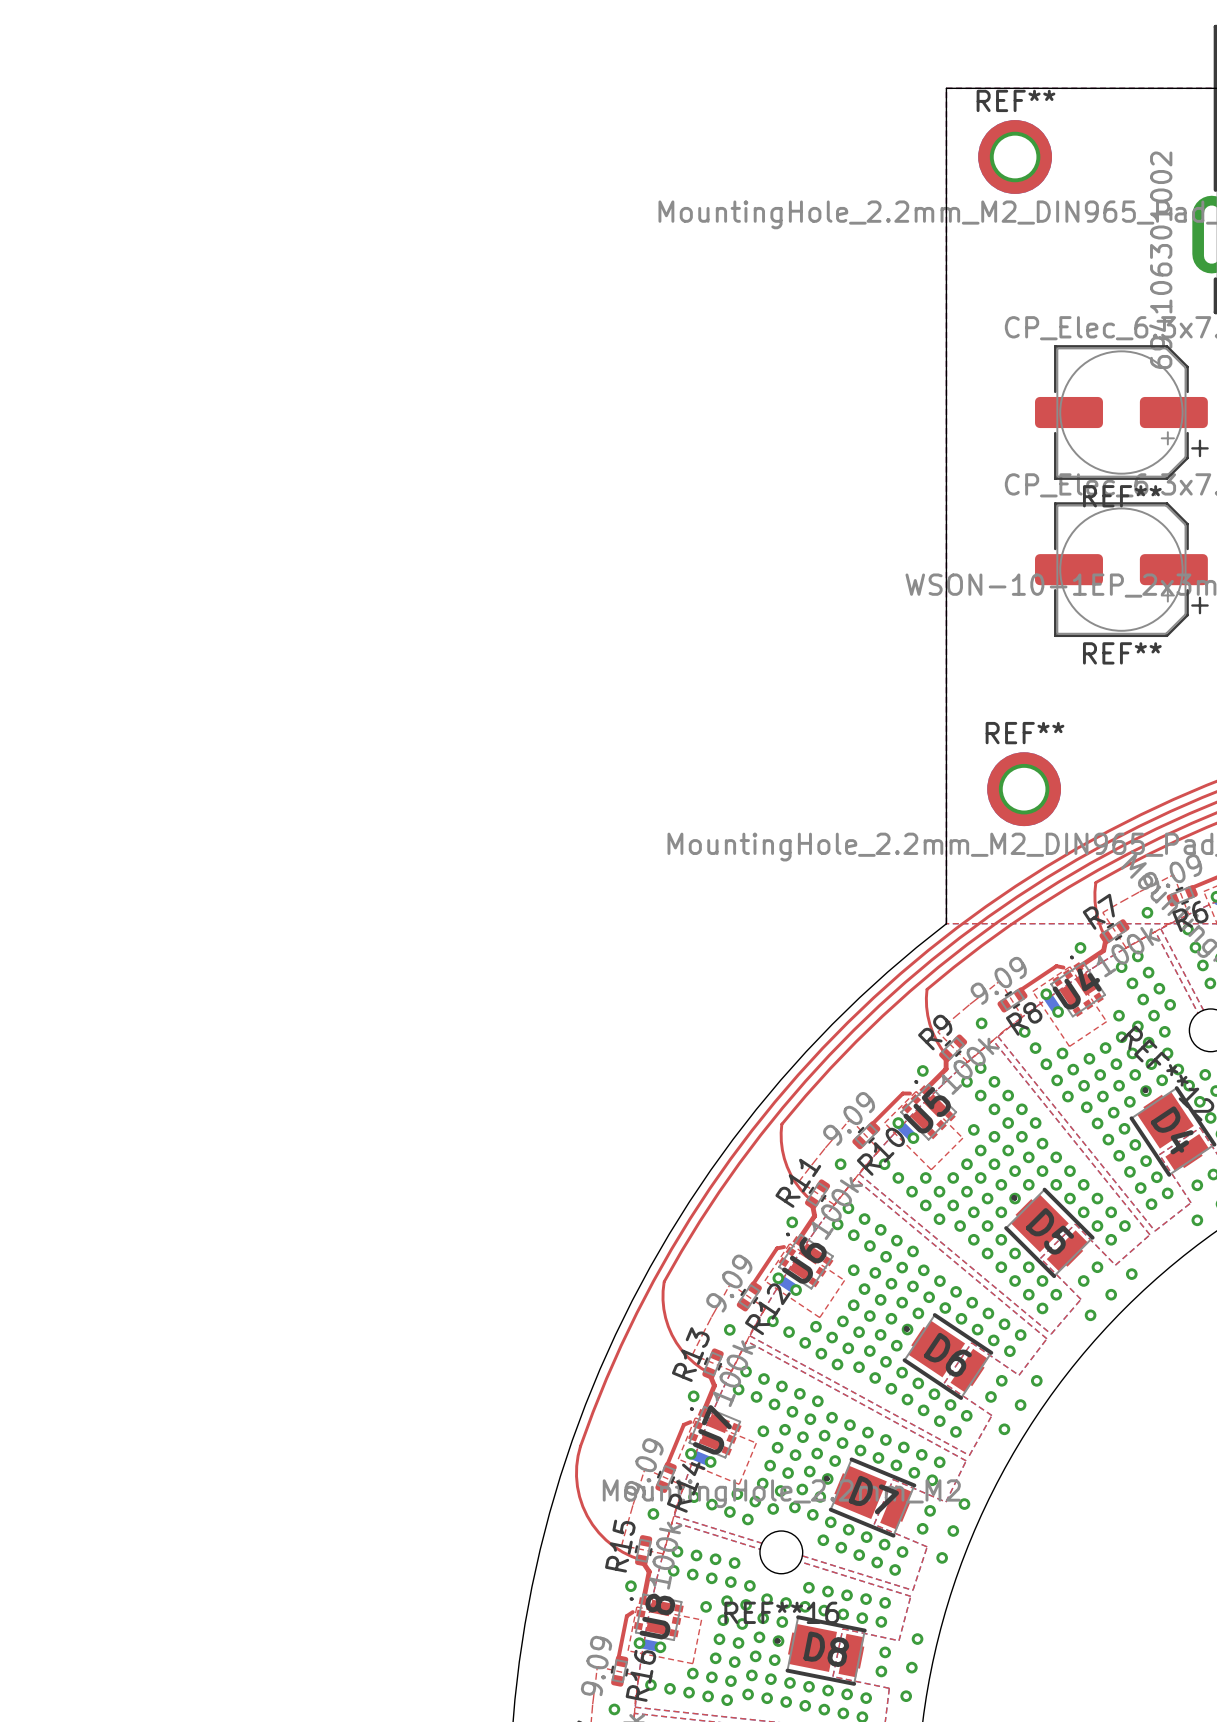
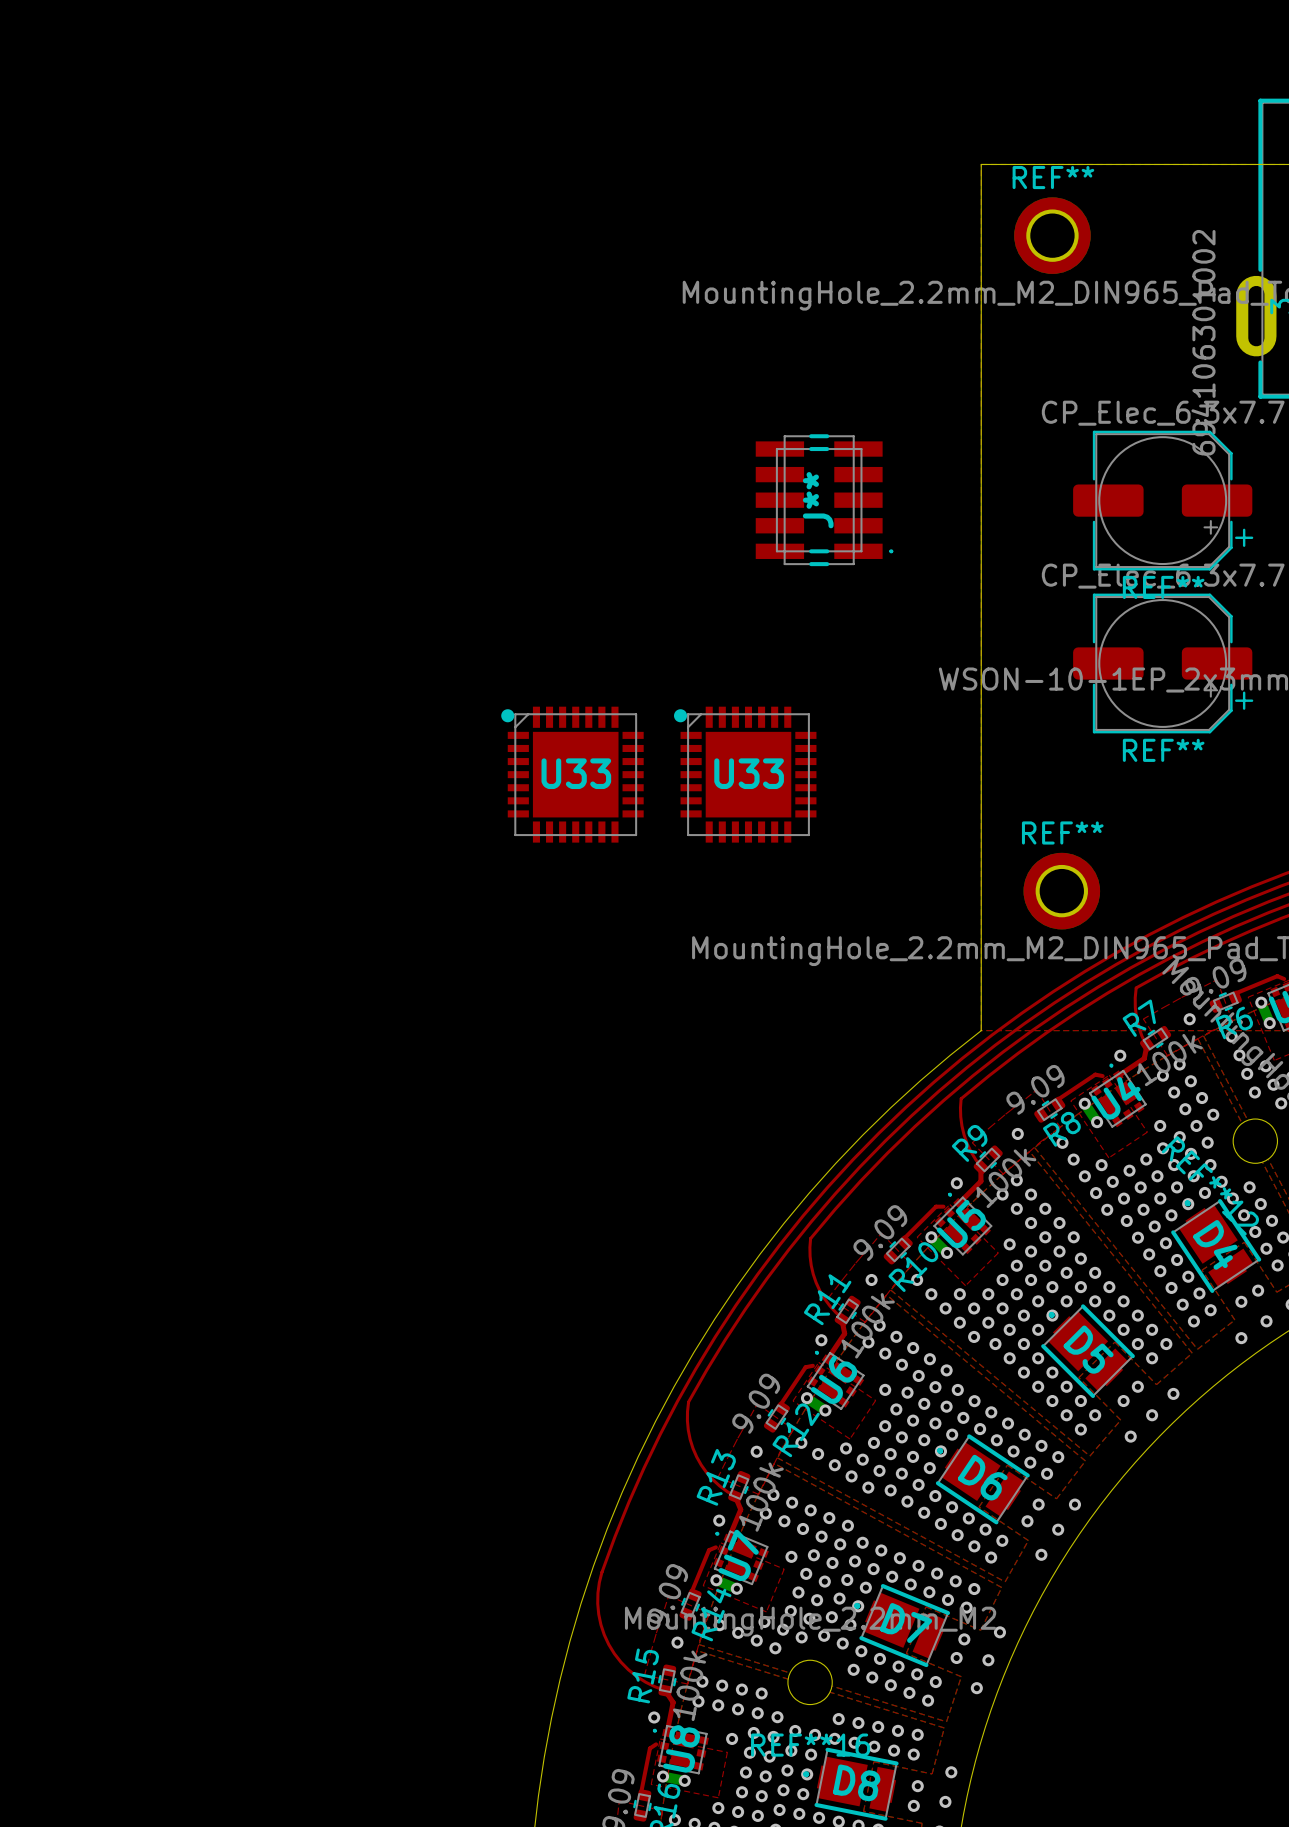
J**: none -> (824, 500)
U33: none -> (572, 774)
U33: none -> (745, 774)

